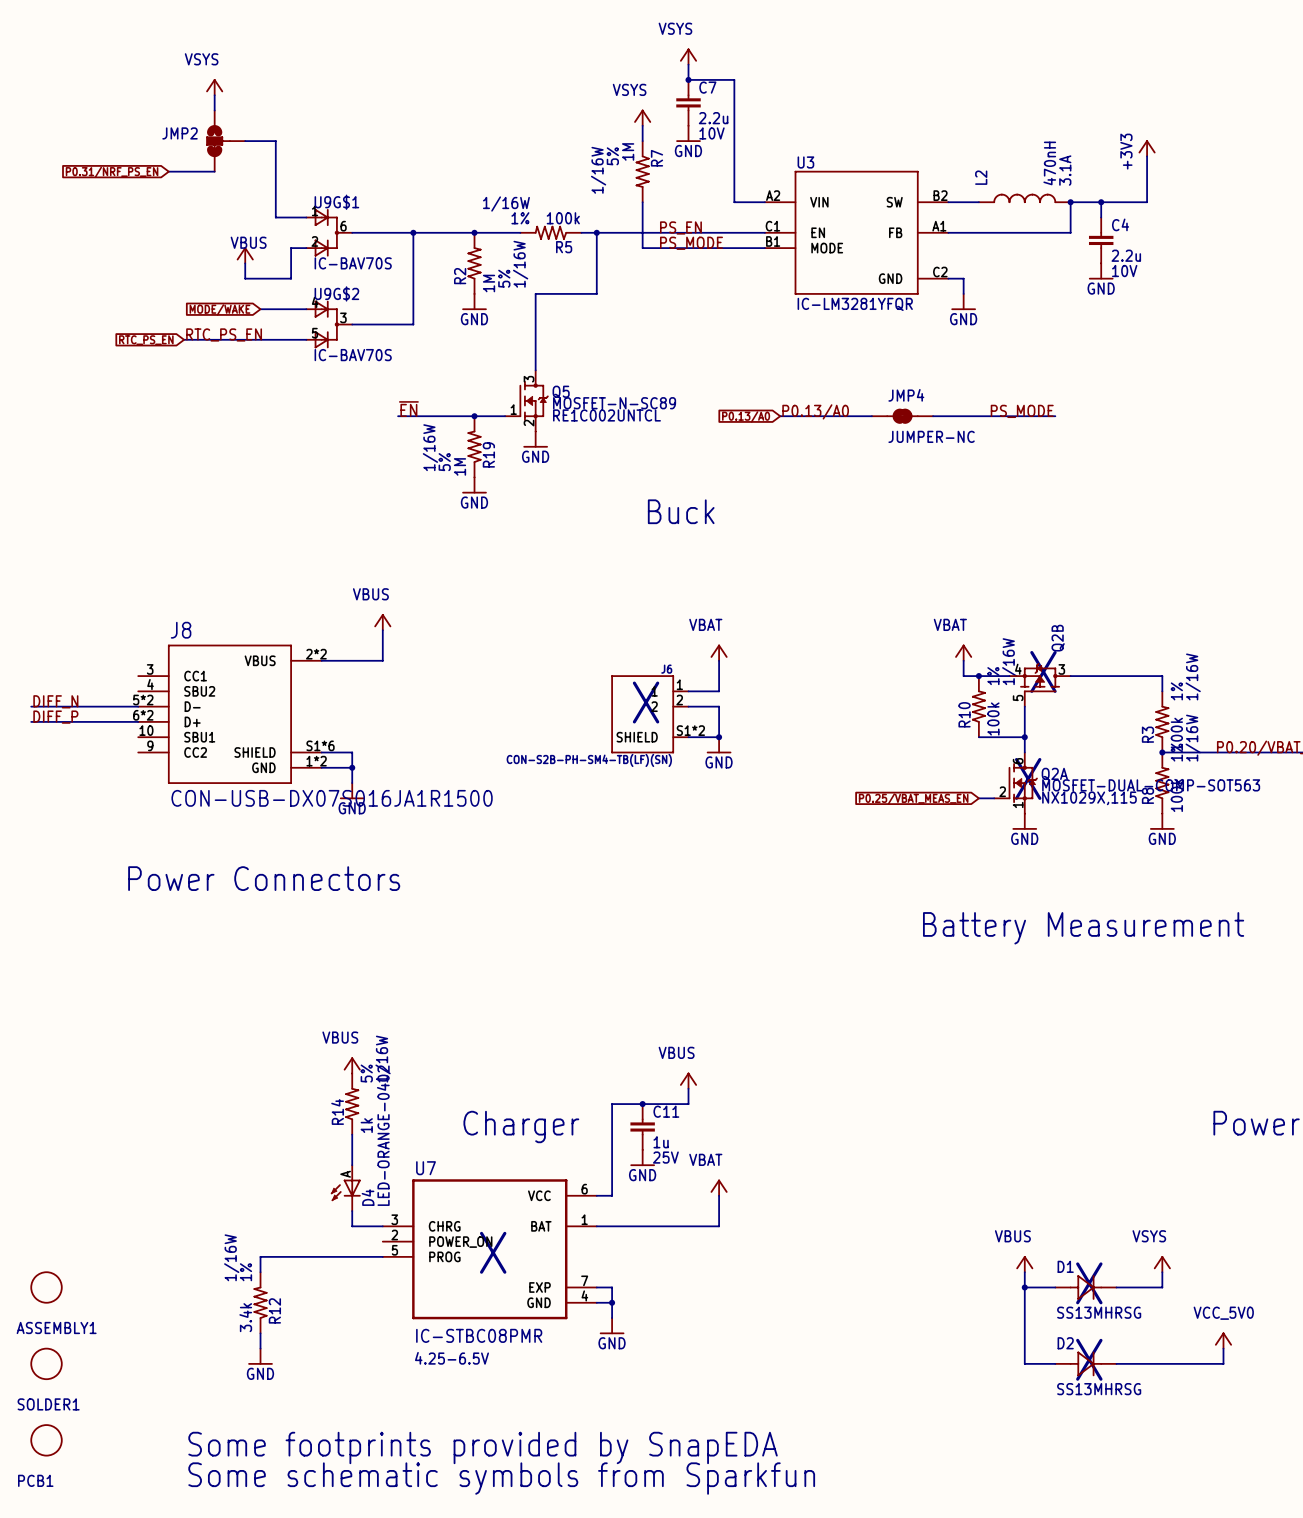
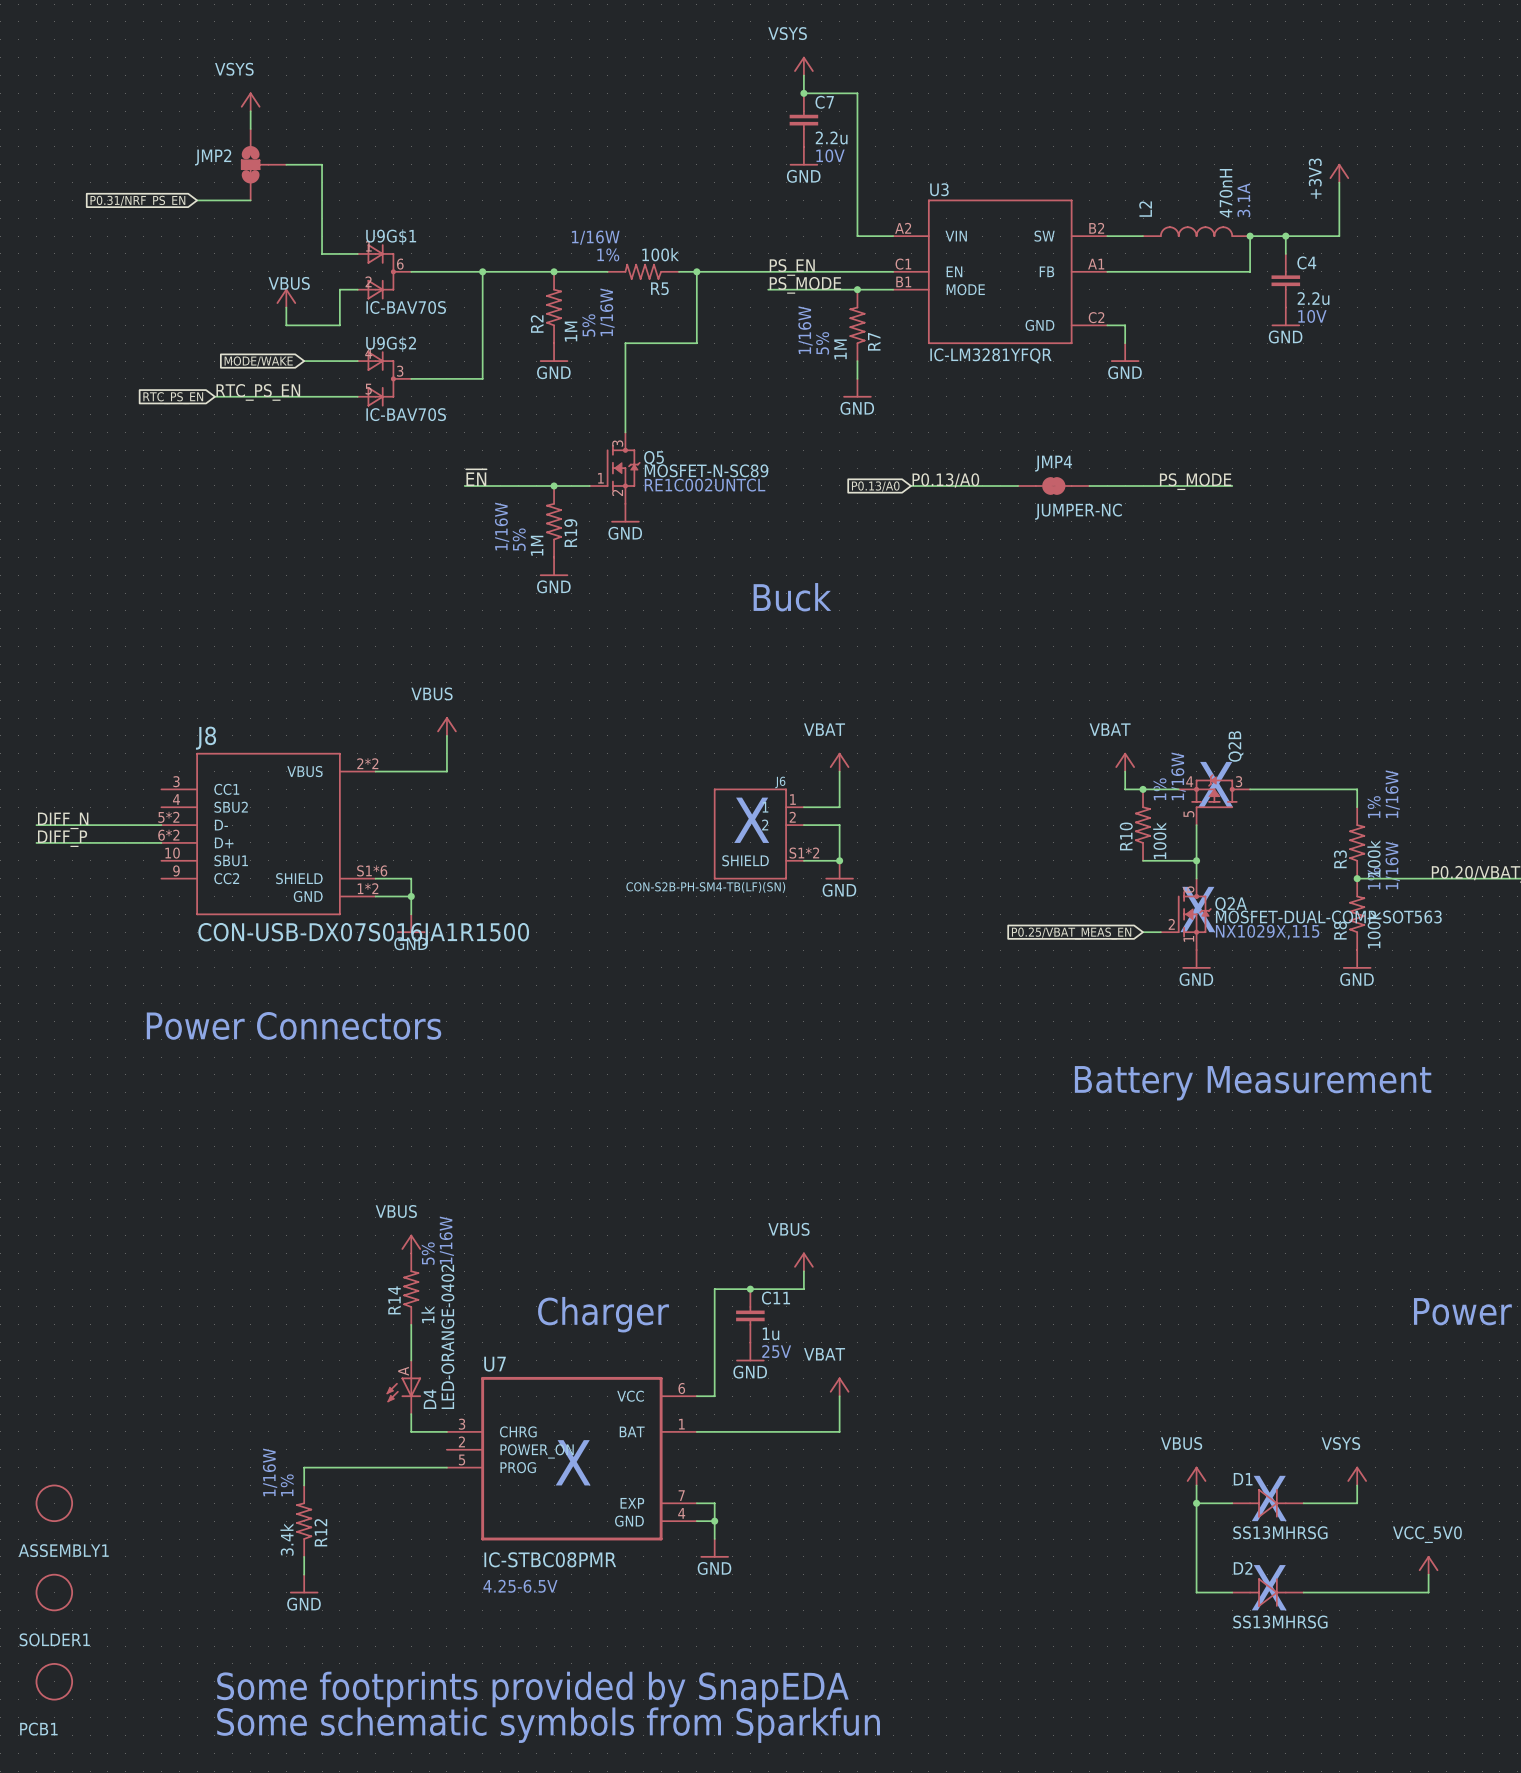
power symbol: VSYS (642, 117) -> none
wire: (642, 125) (642, 141) -> none
R7 flip: as is (642, 171) -> up-down (857, 325)
R7 position: (642, 171) -> (857, 325)
wire: (642, 202) (642, 248) (657, 248) -> none
junction: none -> (857, 289)
wire: none -> (857, 361) (857, 378)
power symbol: none -> GND (857, 388)

